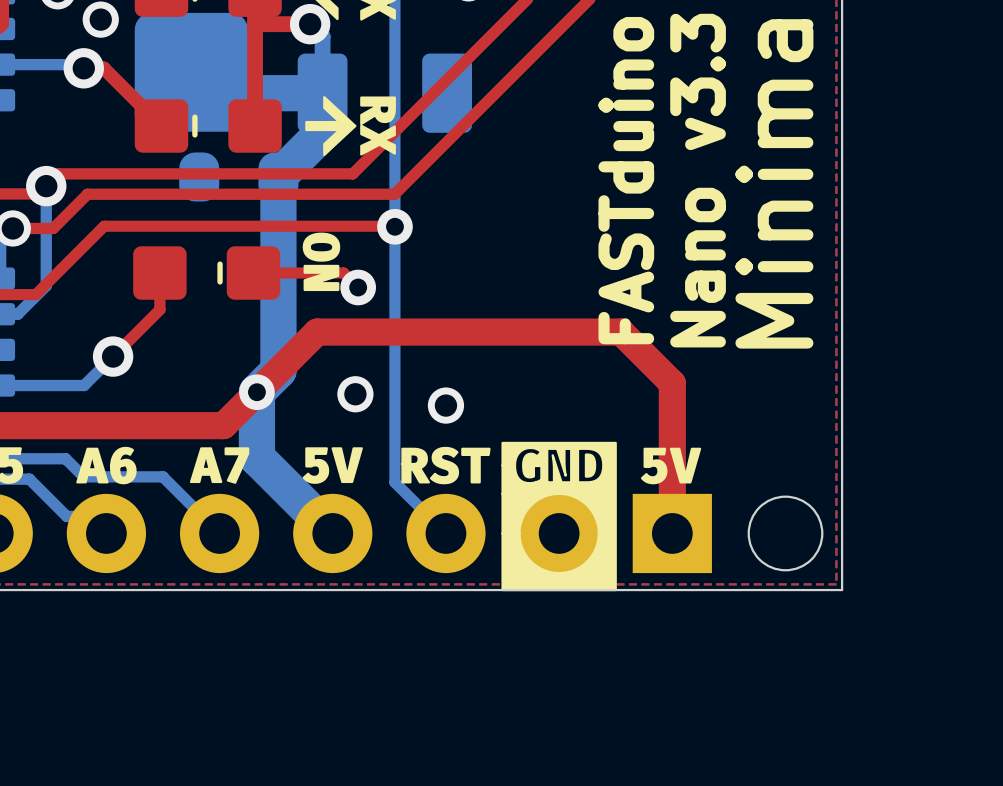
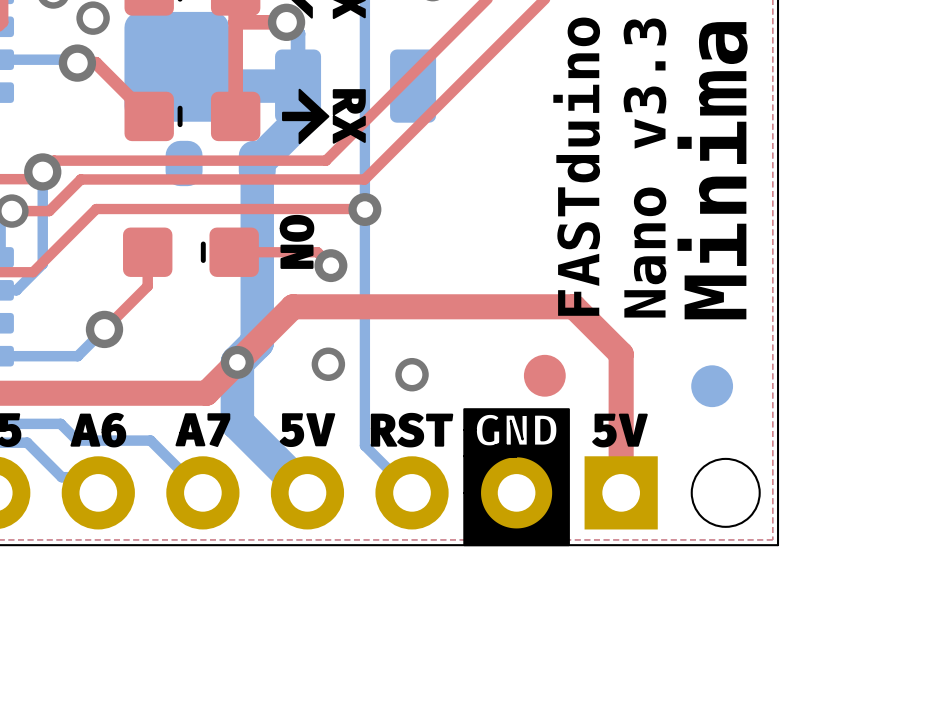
part: none -> (544, 375)
part: none -> (712, 386)

